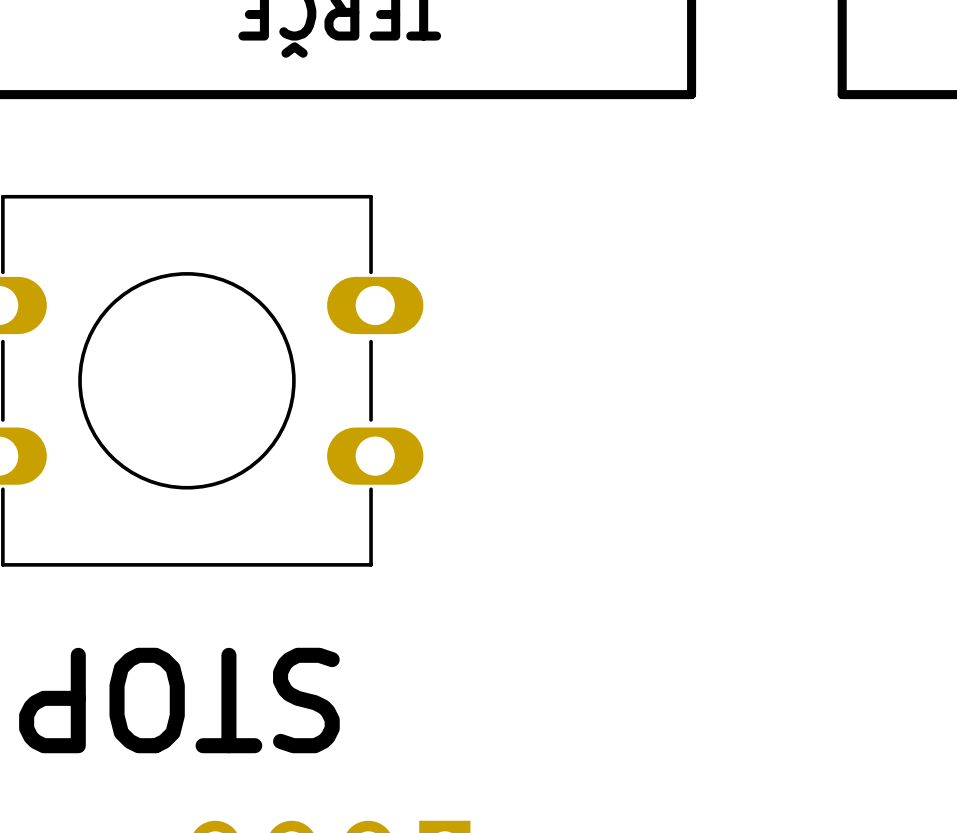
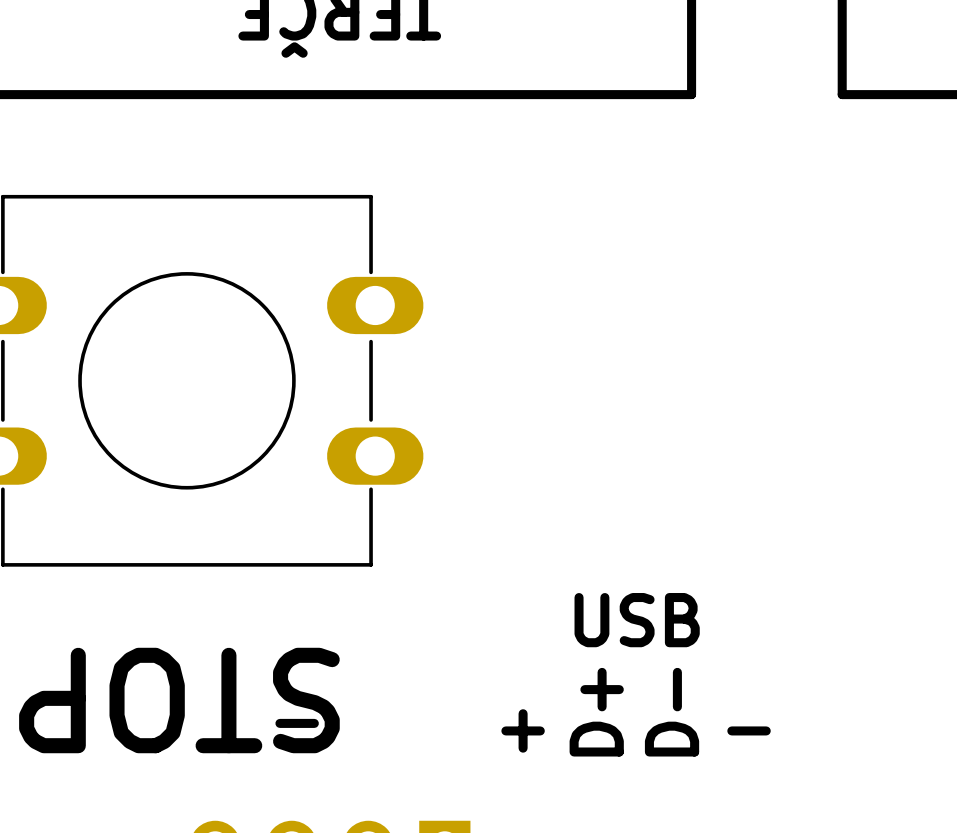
text: none -> USB (637, 620)
text: none -> D+ (596, 712)
text: none -> D- (672, 712)
text: none -> - (297, 723)
text: none -> + (523, 730)
text: none -> - (749, 730)

